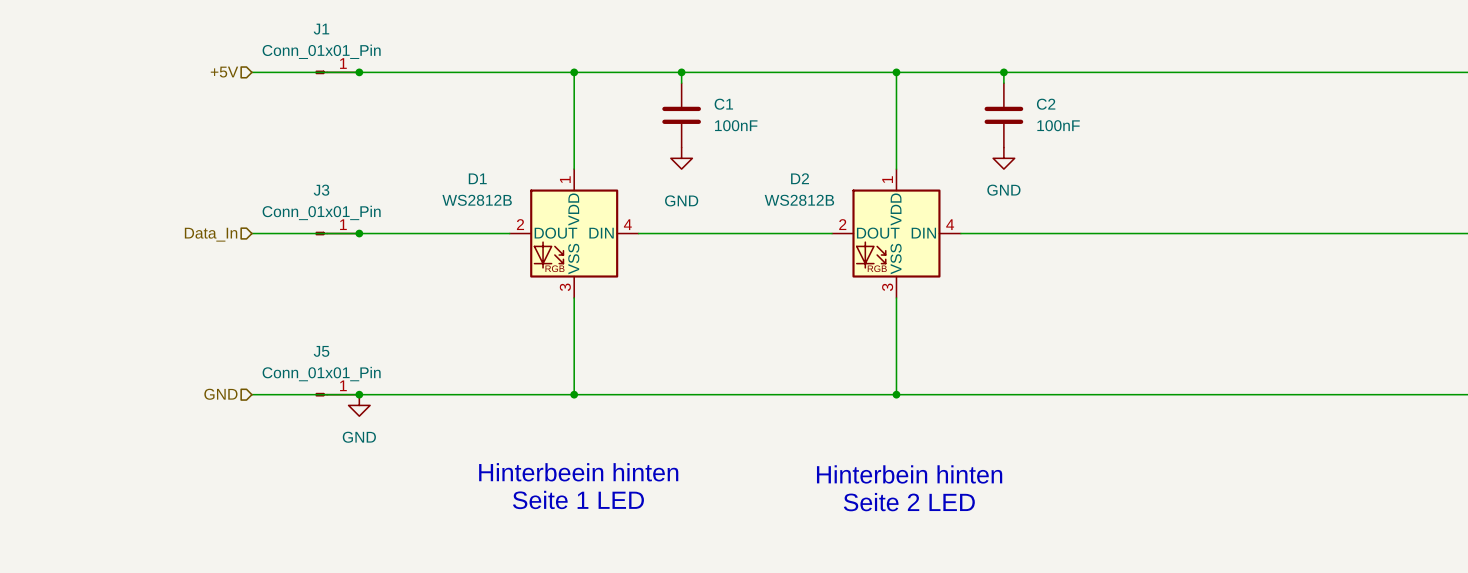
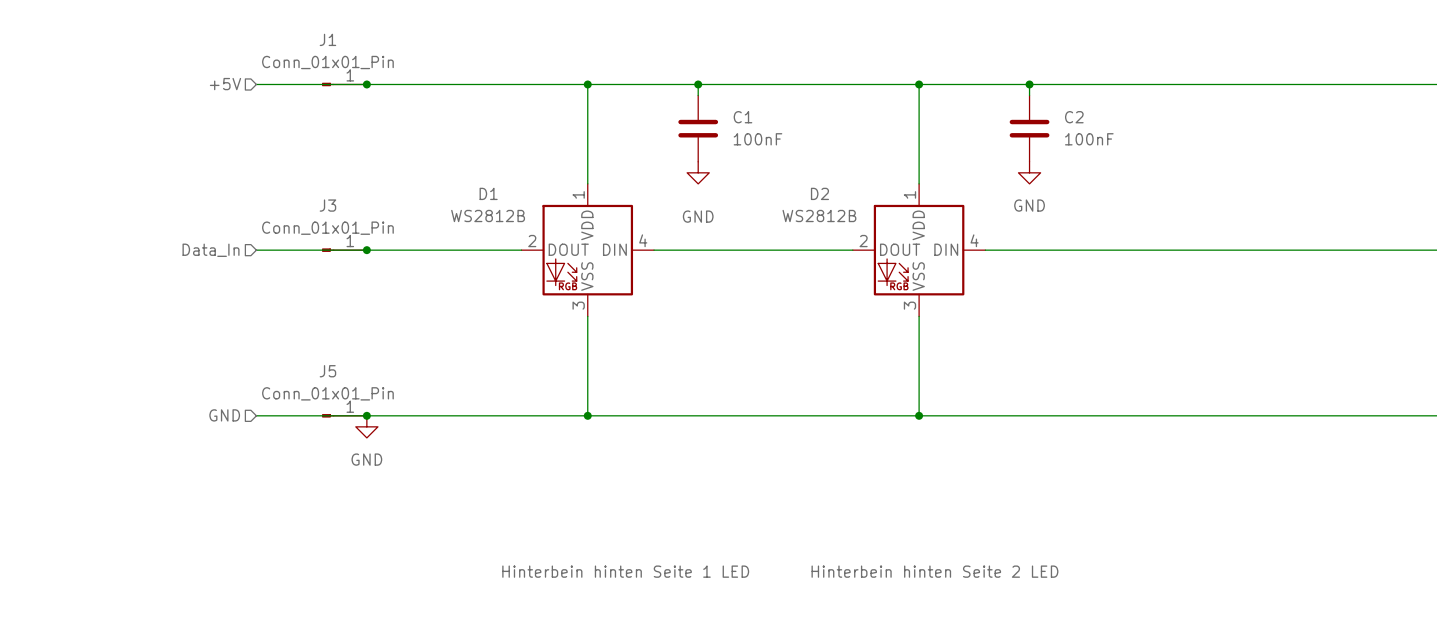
text: Hinterbeein hinten (578, 472) -> none
text: Hinterbein hinten (909, 474) -> none
text: Seite 1 LED (578, 499) -> none
text: Seite 2 LED (909, 502) -> none
label: none -> Hinterbein hinten Seite 1 LED (625, 571)
label: none -> Hinterbein hinten Seite 2 LED (934, 571)

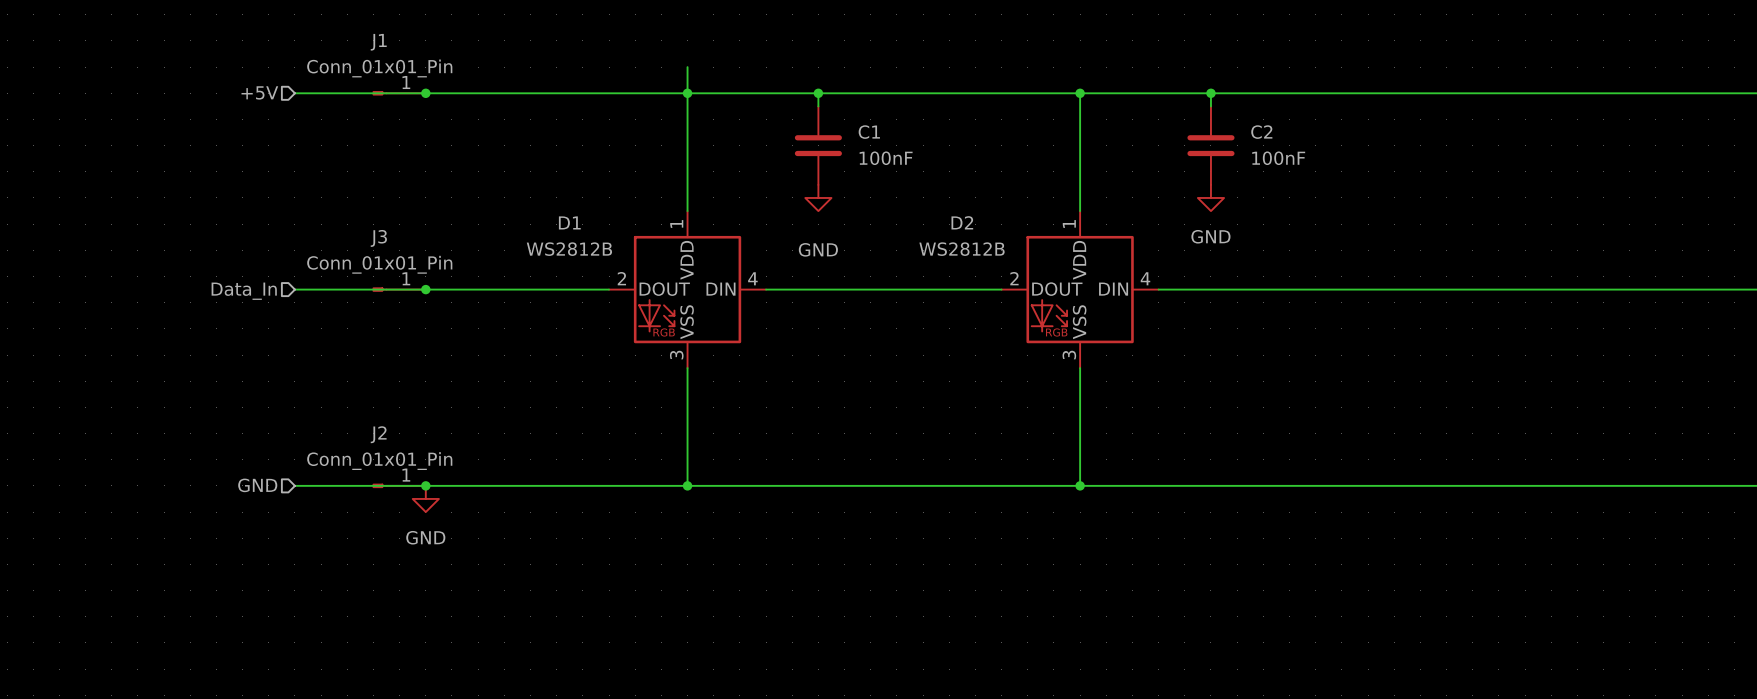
wire: none -> (687, 67) (687, 93)
J5 name: J5 (327, 371) -> J2 (378, 434)
label: Hinterbein hinten Seite 1 LED (625, 571) -> none
label: Hinterbein hinten Seite 2 LED (934, 571) -> none

